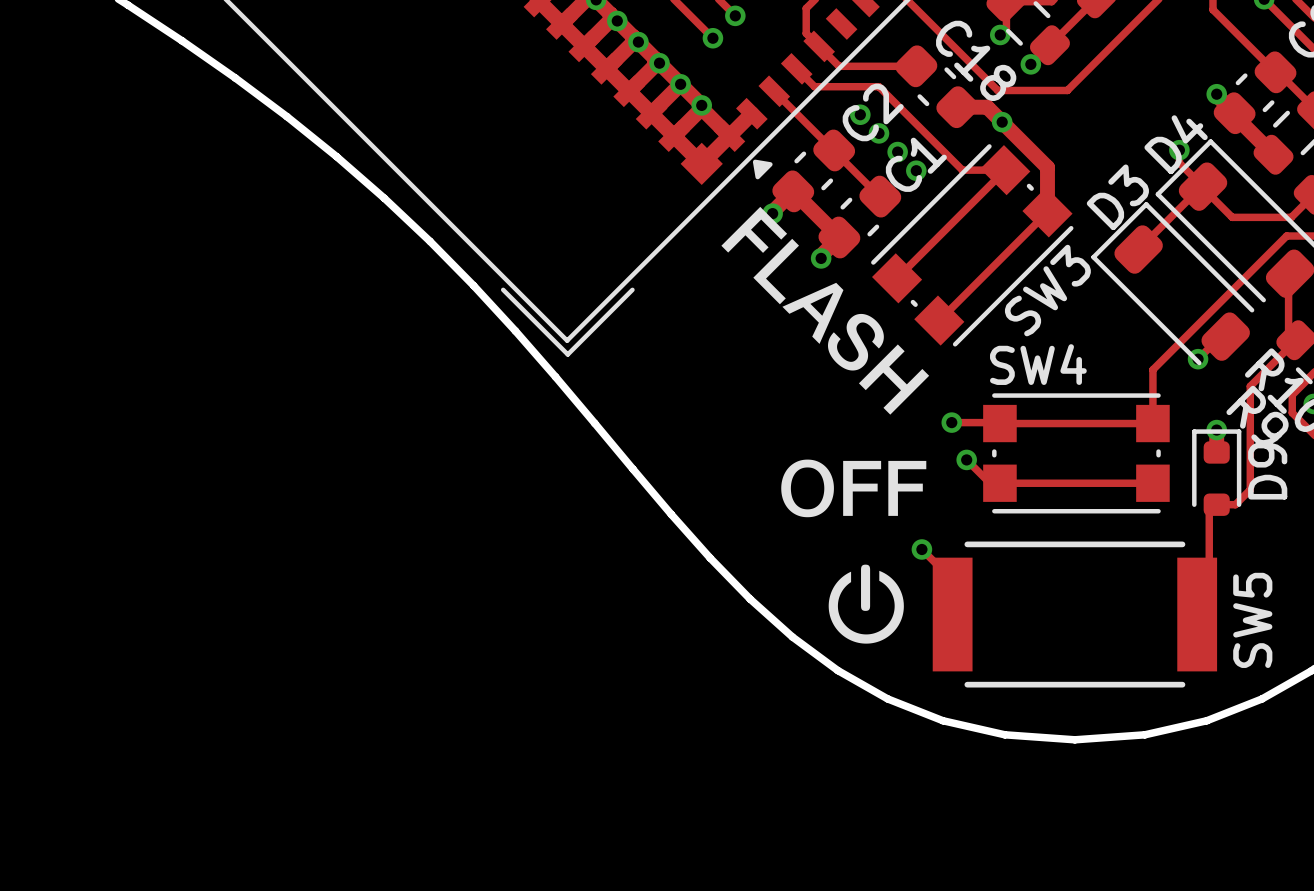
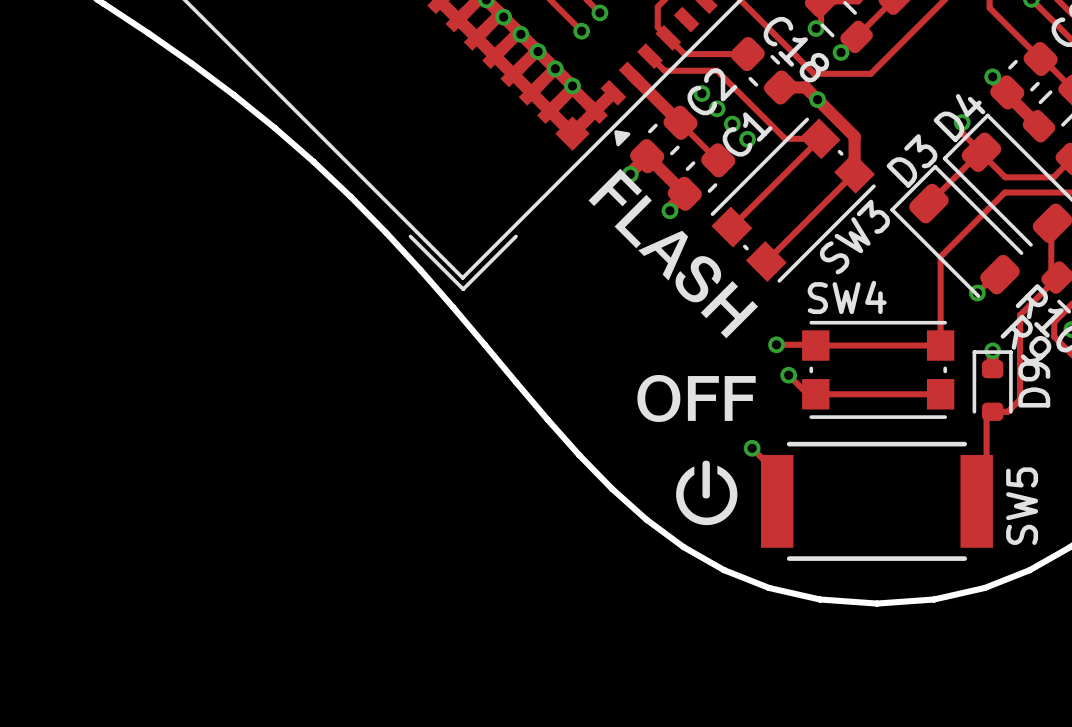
track width: thin (774, 91) (833, 150) -> thick (631, 74) (680, 122)
track: (1286, 236) (1152, 369) -> (1049, 192) (1004, 192) (940, 256) (940, 301)

